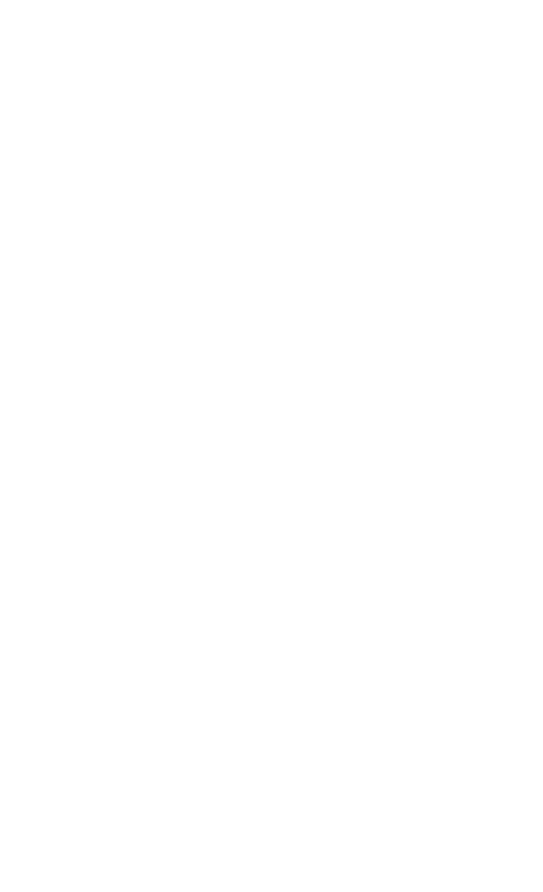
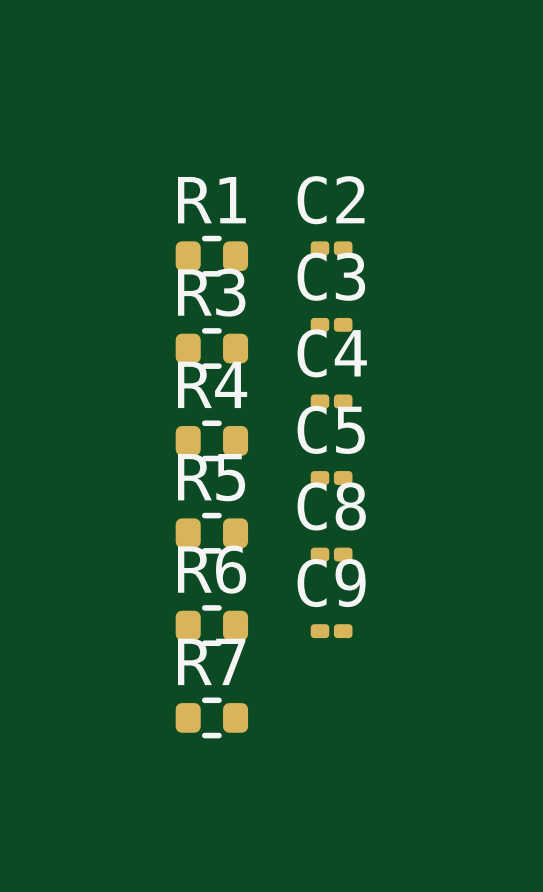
C2: none -> (331, 248)
R1: none -> (211, 256)
C3: none -> (331, 324)
R3: none -> (211, 348)
C4: none -> (331, 401)
R4: none -> (211, 440)
C5: none -> (331, 478)
R5: none -> (211, 533)
C8: none -> (331, 554)
R6: none -> (211, 625)
C9: none -> (331, 631)
R7: none -> (211, 717)

